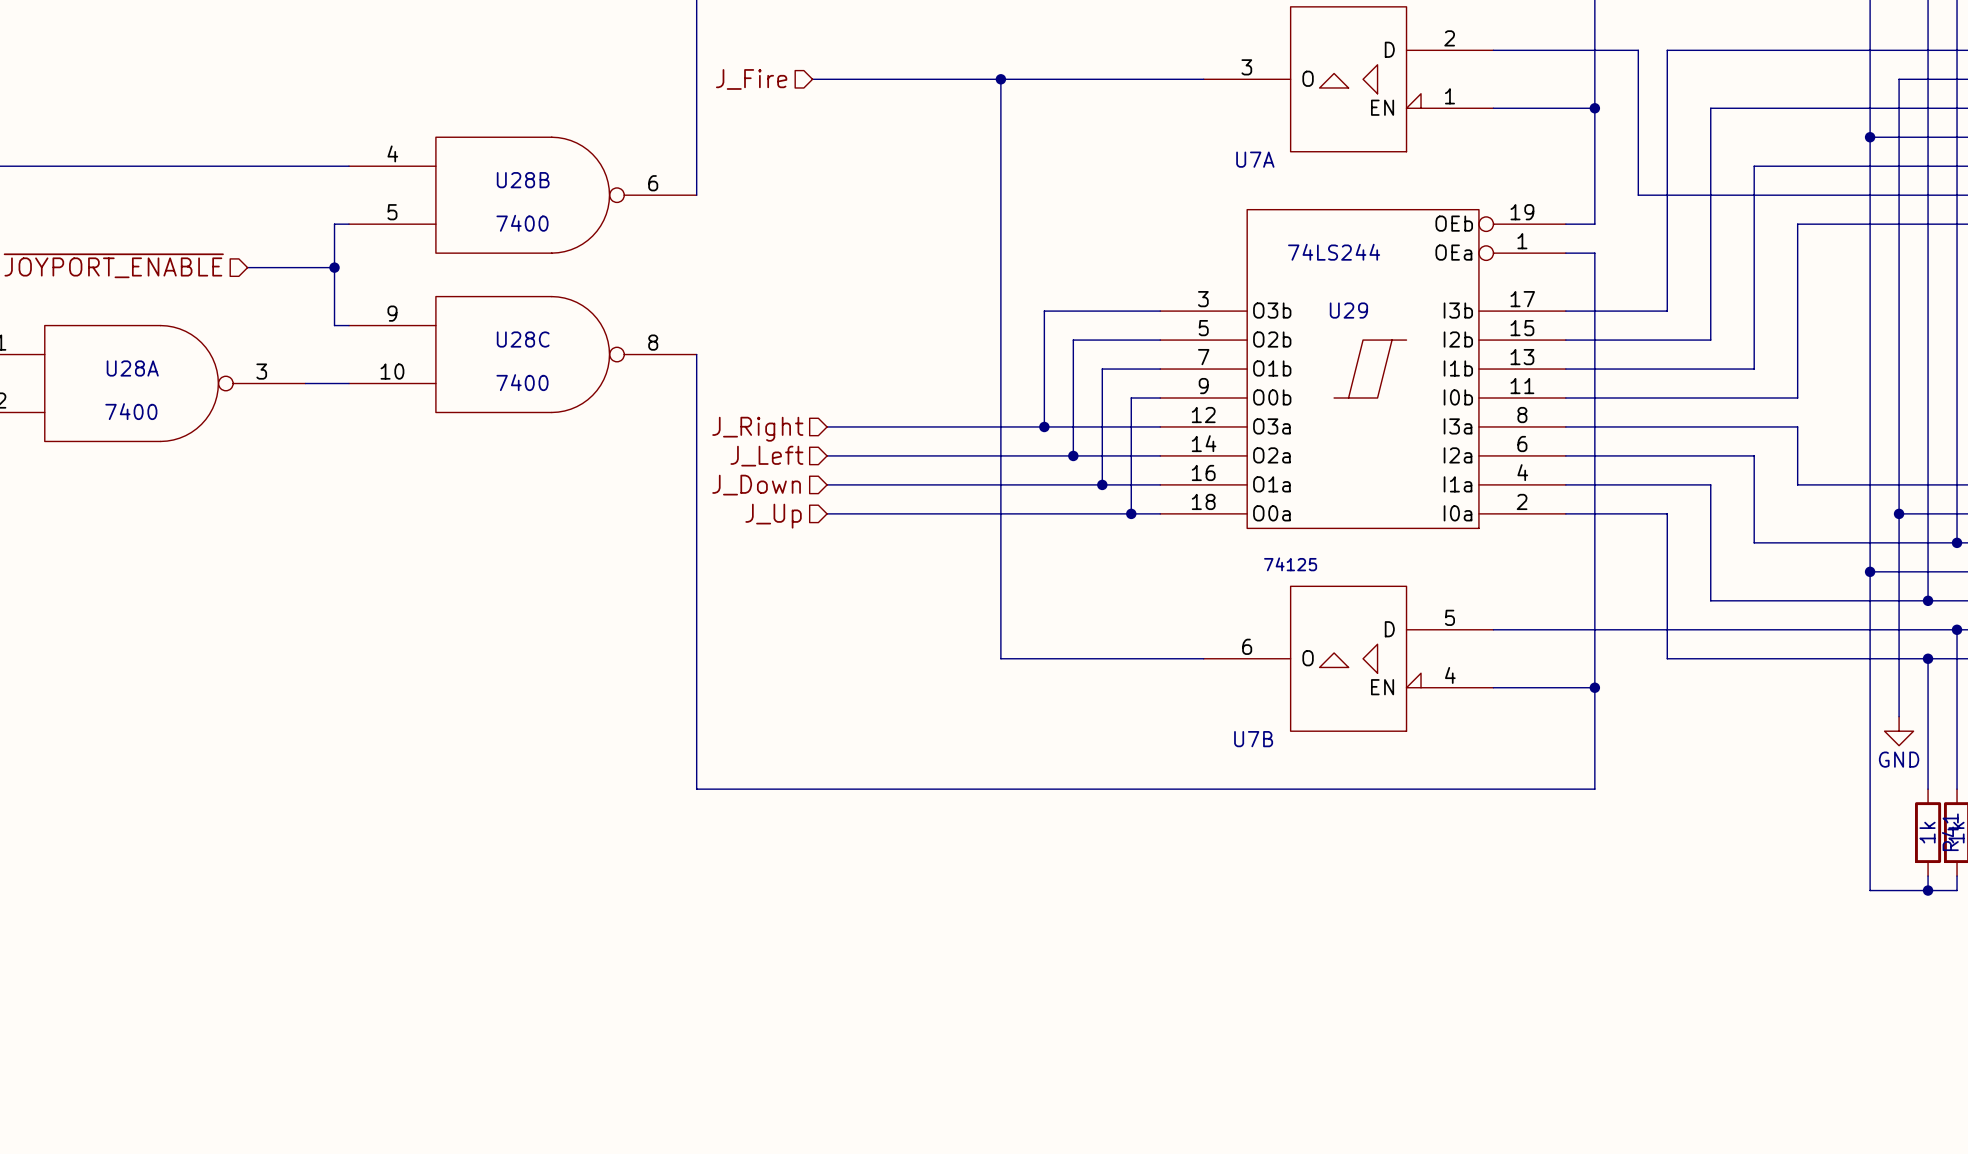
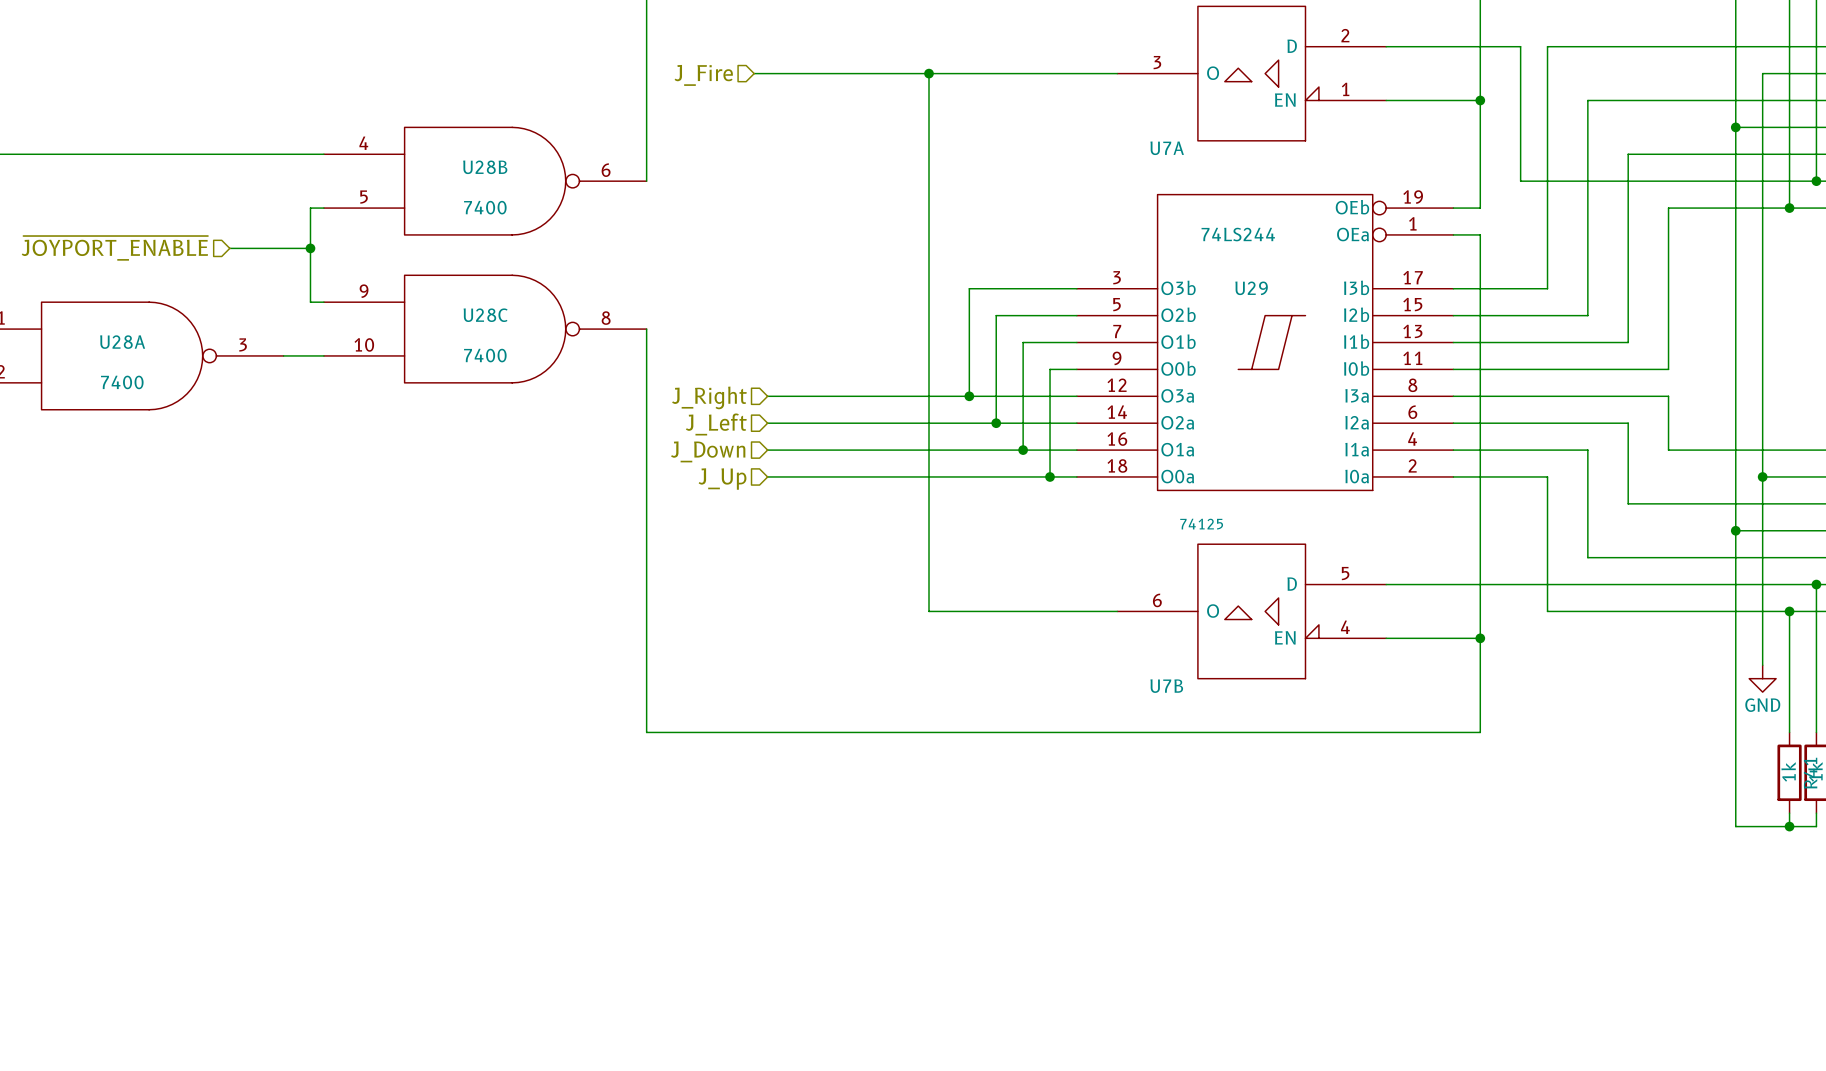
wire: (1957, 195) (1957, 542) -> none
junction: none -> (1816, 181)
wire: (1928, 224) (1928, 600) -> none
junction: none -> (1789, 208)
junction: (1957, 542) -> none
junction: (1928, 600) -> none

